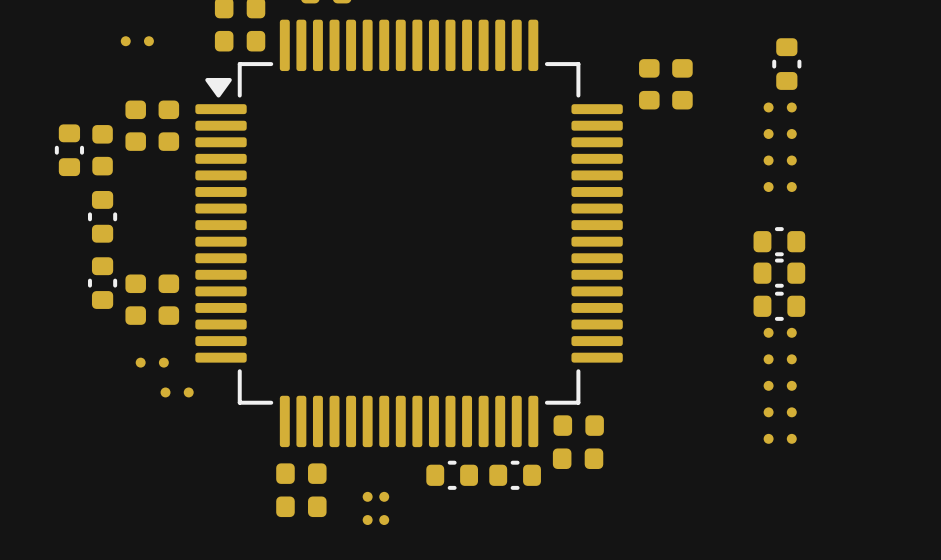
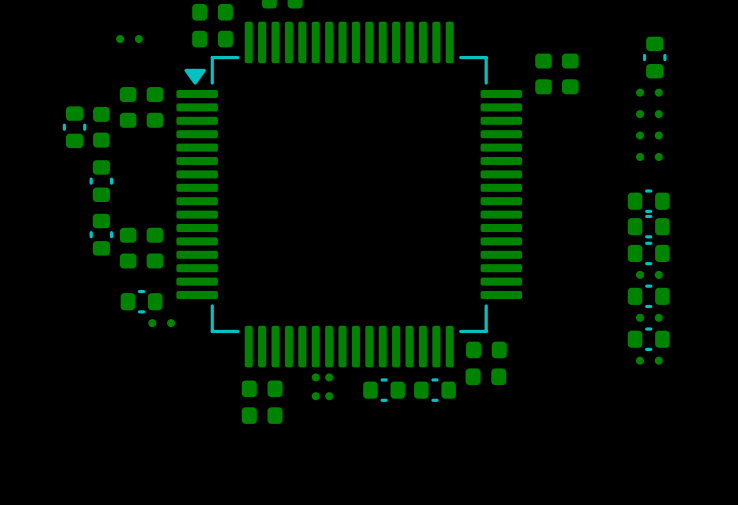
part footprint: [763, 354, 797, 365] -> [627, 284, 670, 309]
part footprint: [135, 357, 169, 368] -> [120, 289, 163, 314]
part footprint: [763, 407, 797, 418] -> [627, 327, 670, 352]
part: none -> (315, 386)
part: none -> (329, 386)
part: (367, 508) -> none
part: (384, 508) -> none

